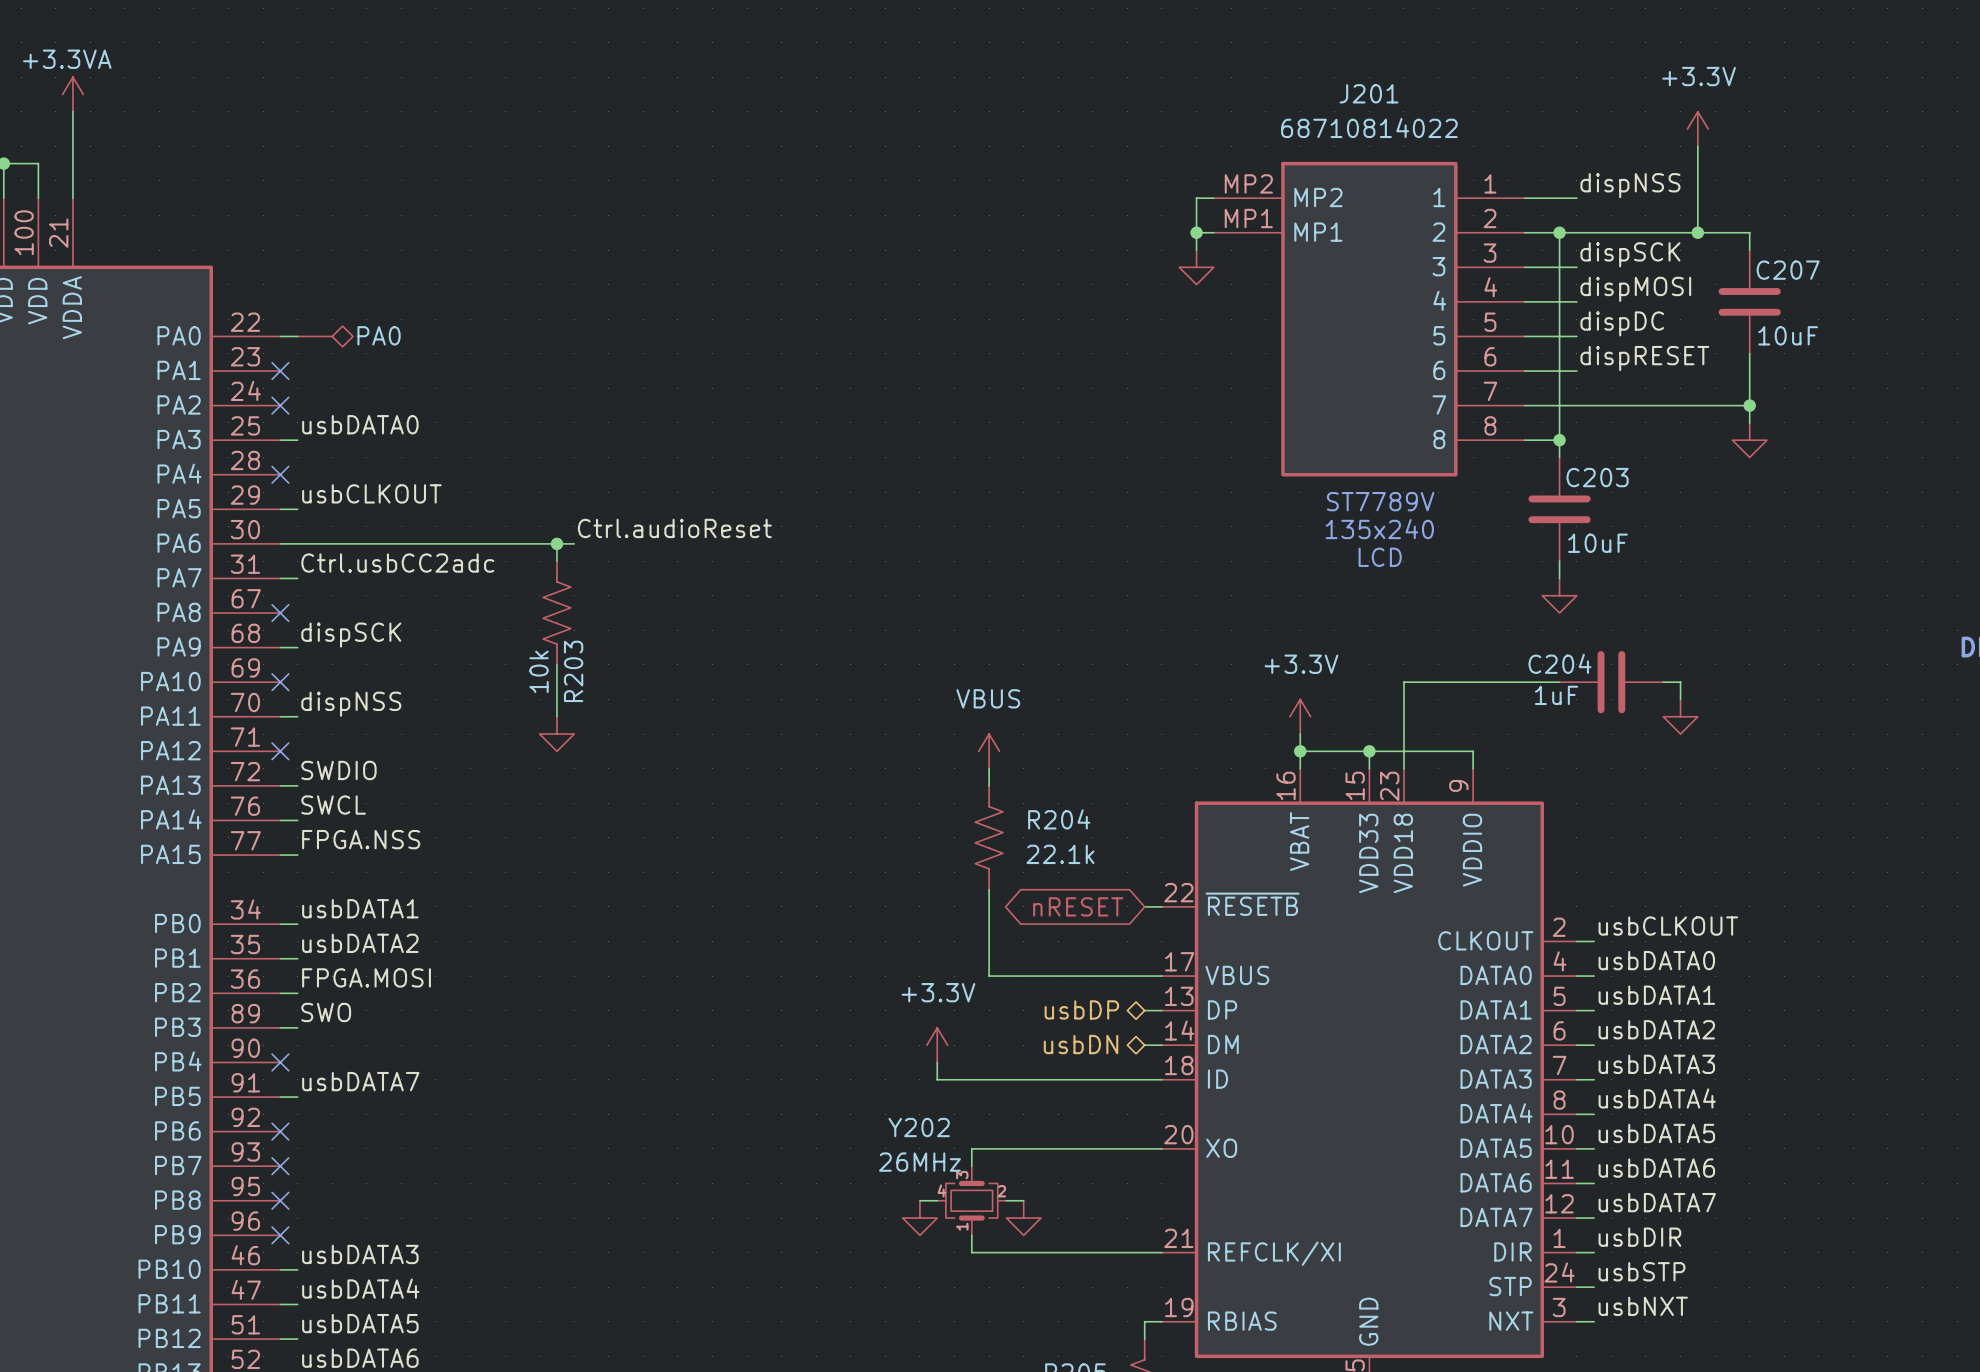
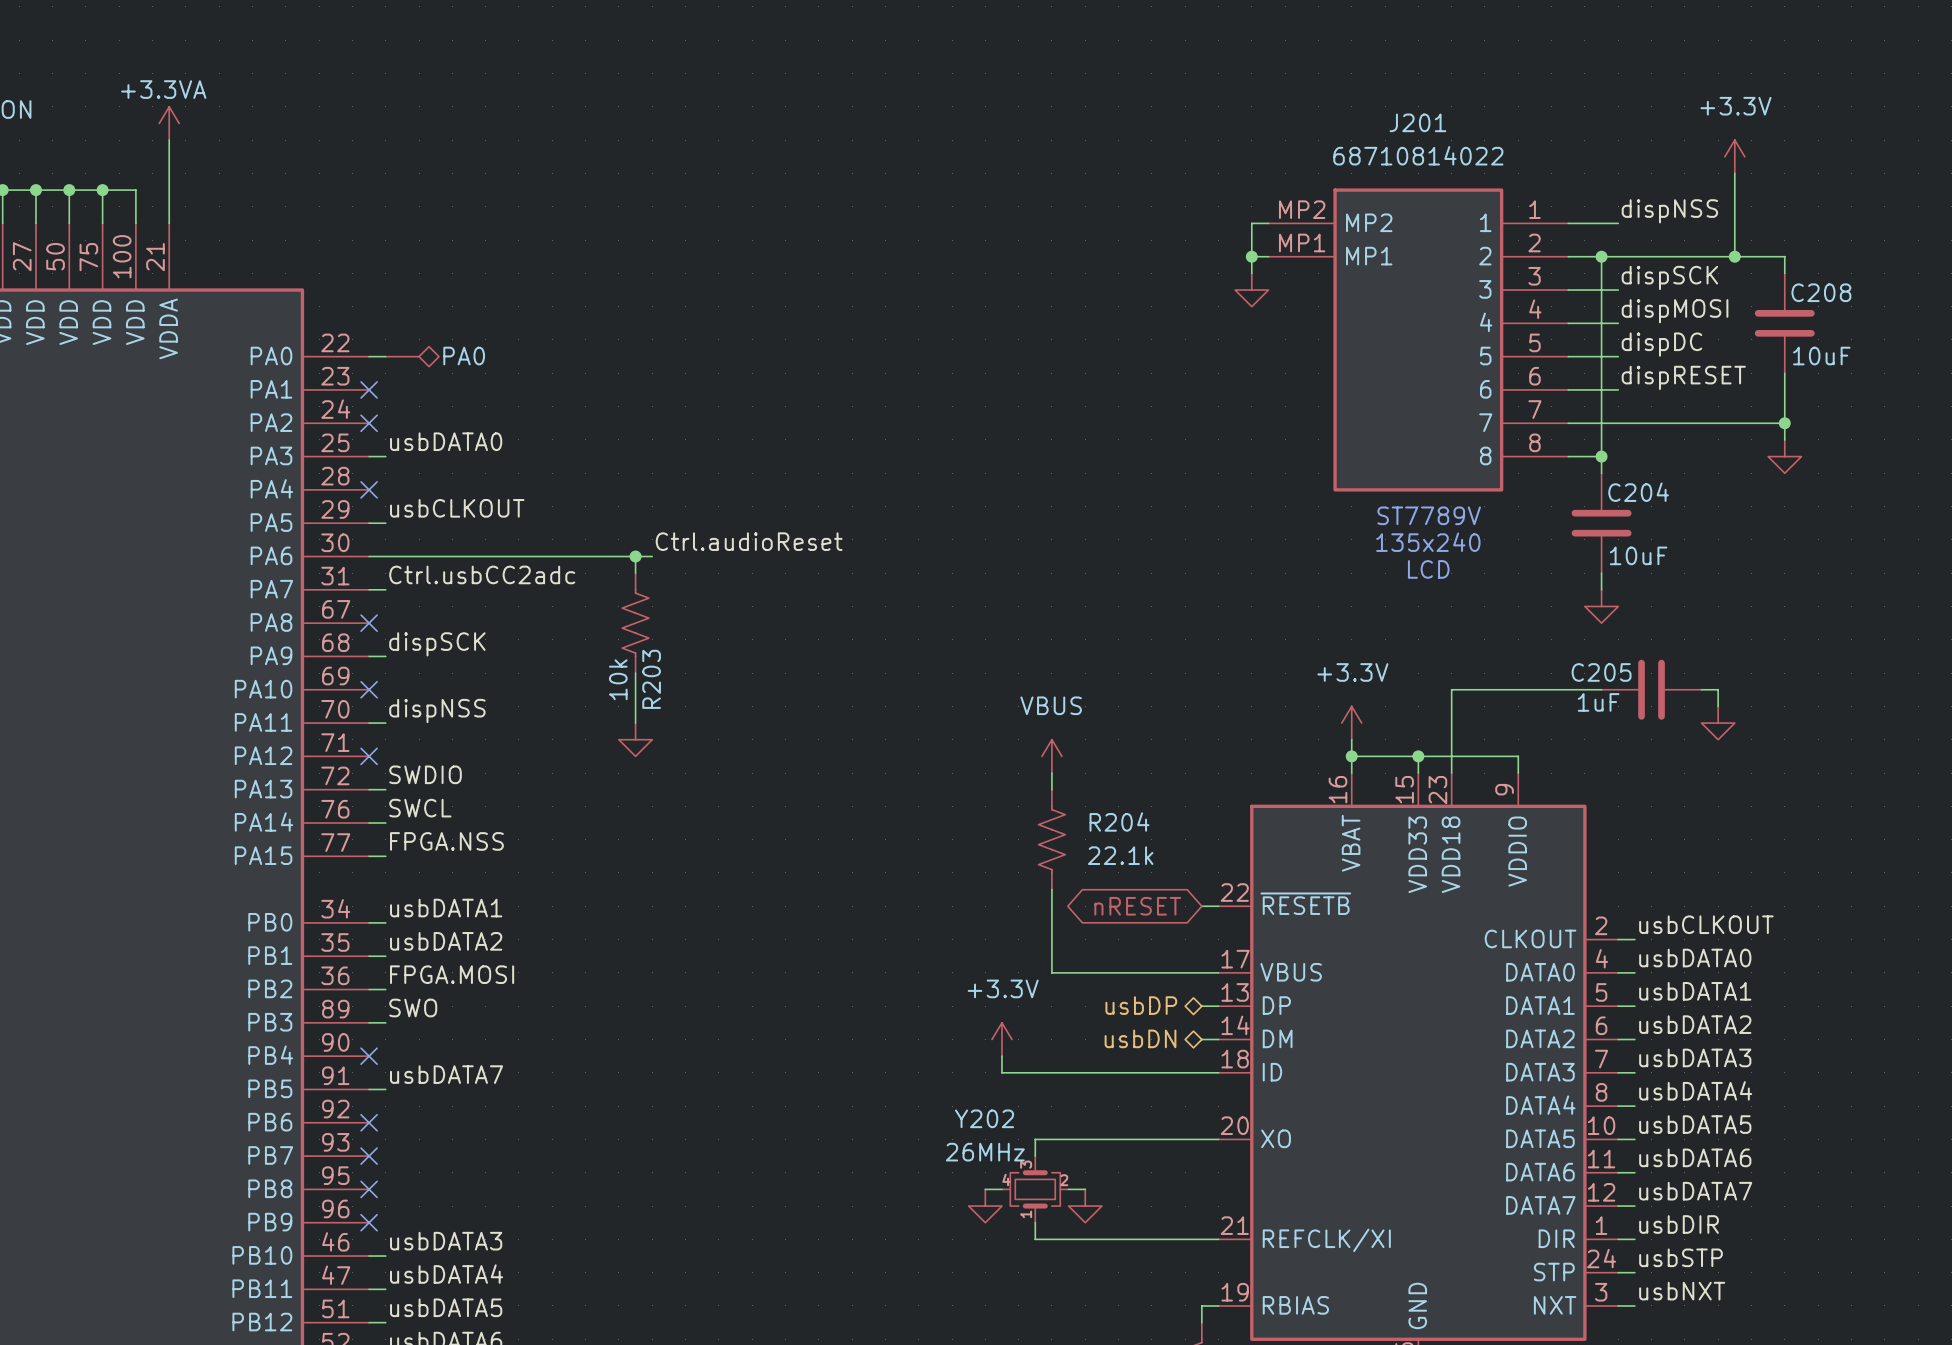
C207 name: C207 (1788, 270) -> C208 (1821, 292)
C203 name: C203 (1597, 477) -> C204 (1638, 492)
C204 name: C204 (1559, 663) -> C205 (1601, 672)

